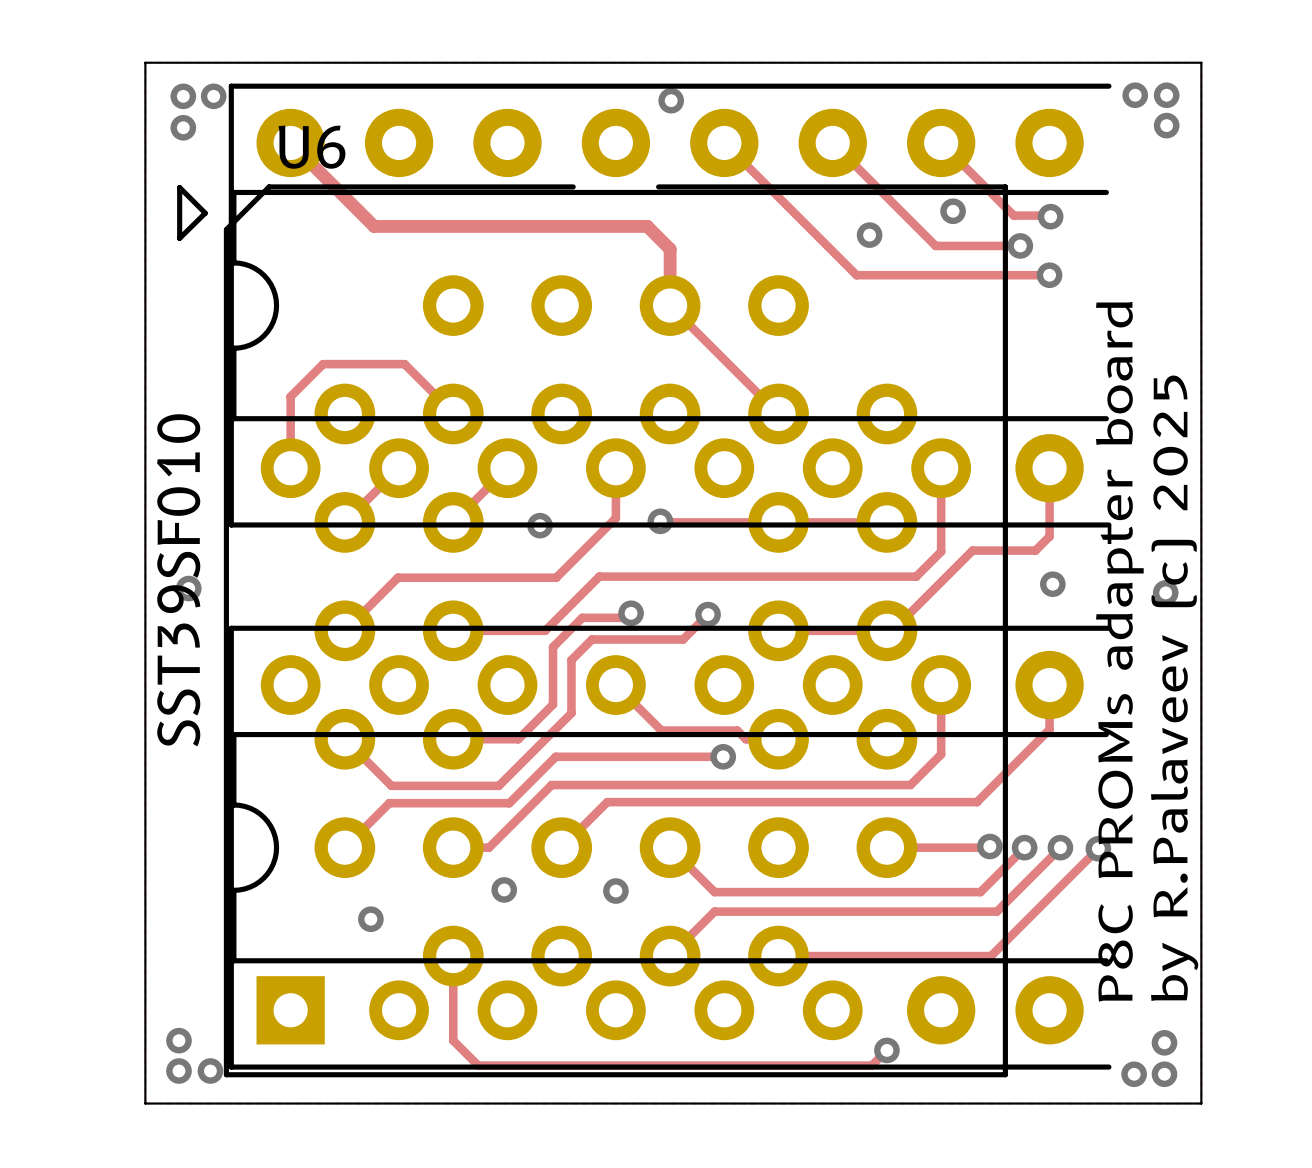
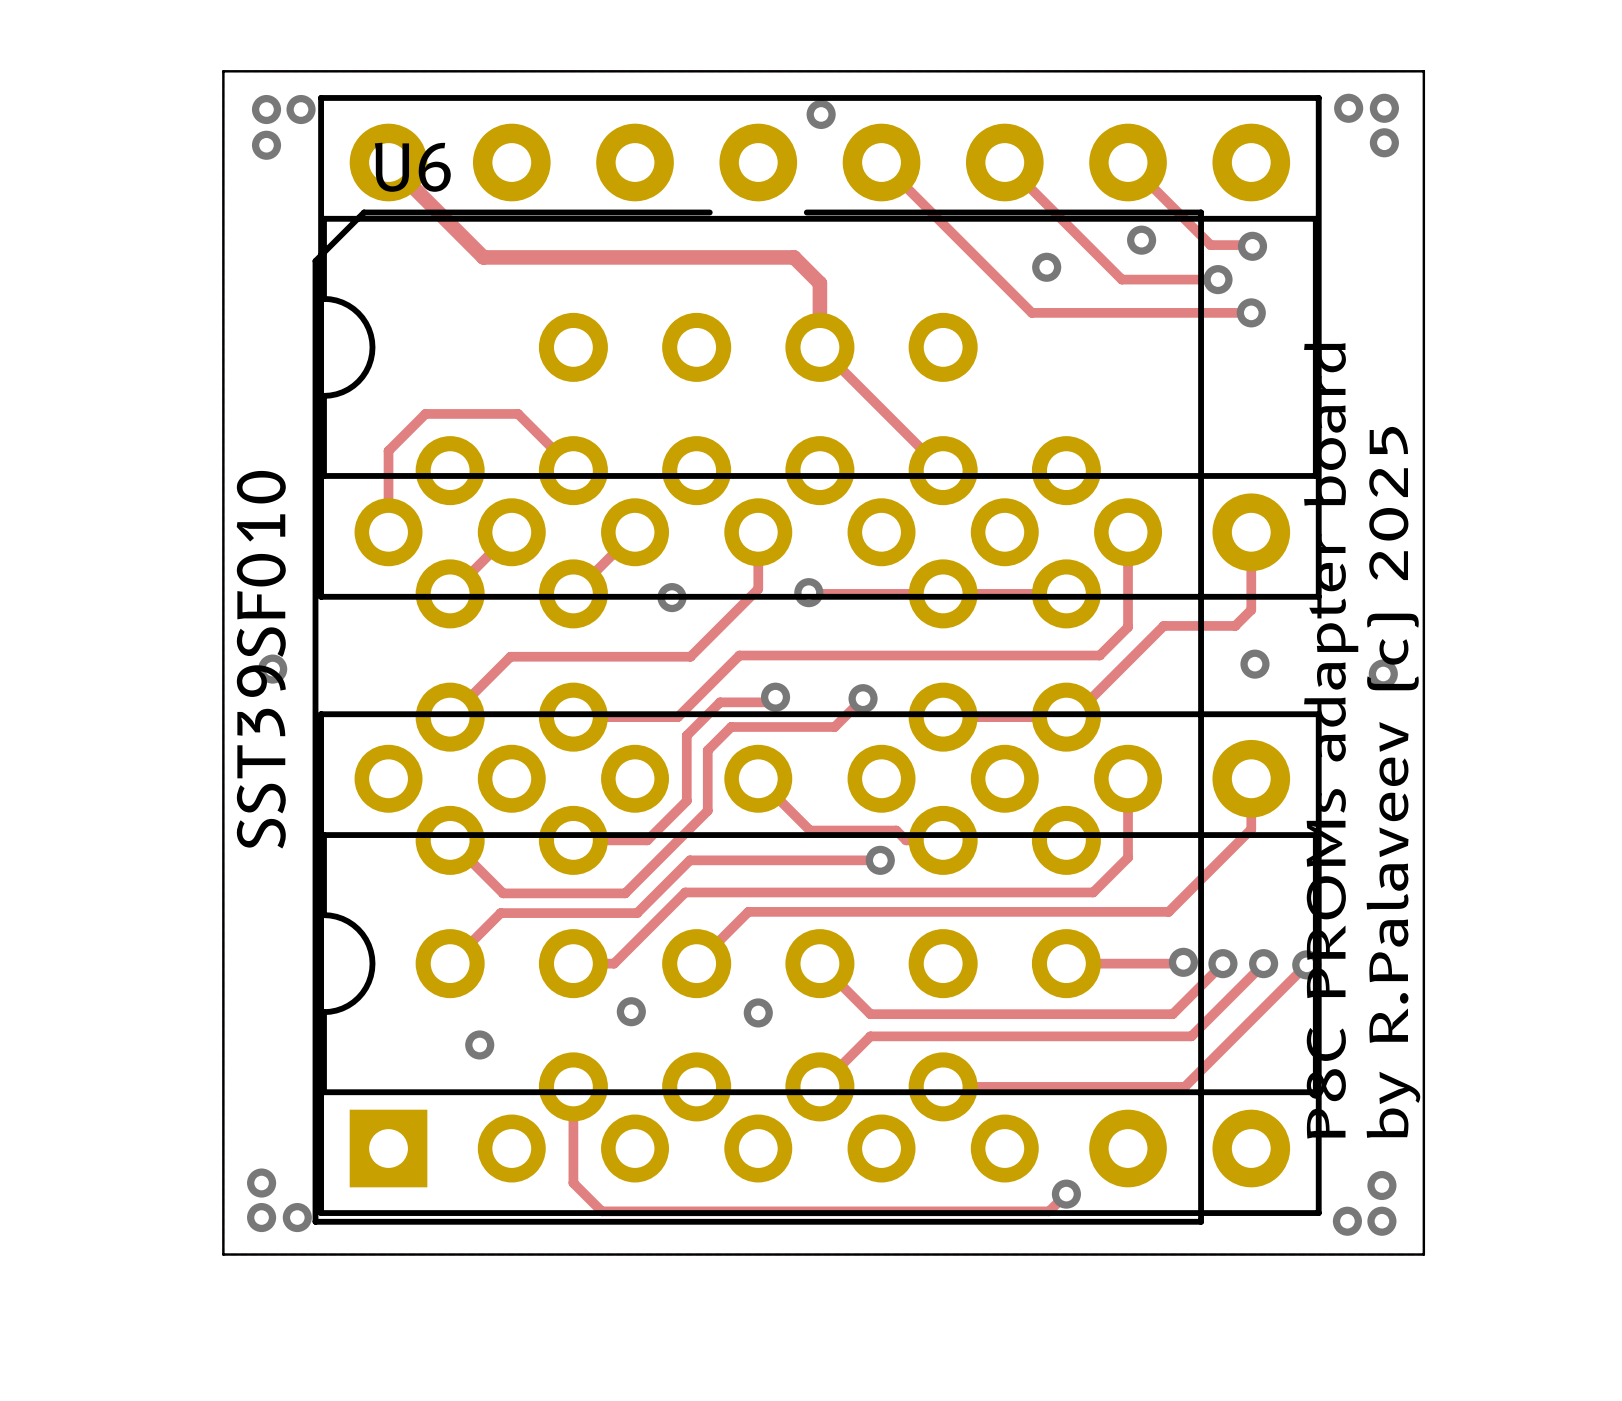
part footprint: [228, 83, 1112, 528] -> [318, 95, 1322, 600]
U6 footprint: [177, 184, 1008, 1078] -> [312, 209, 1204, 1225]
part footprint: [228, 625, 1112, 1070] -> [318, 711, 1322, 1216]

